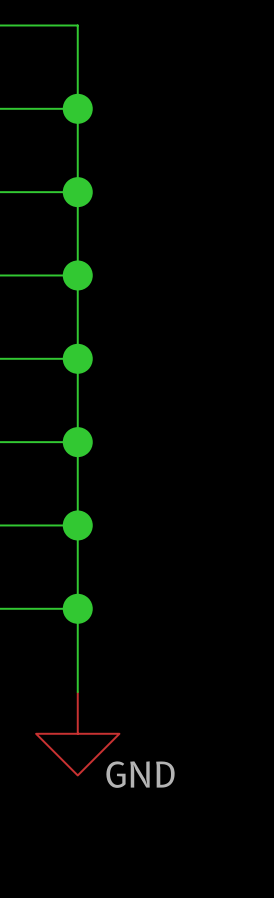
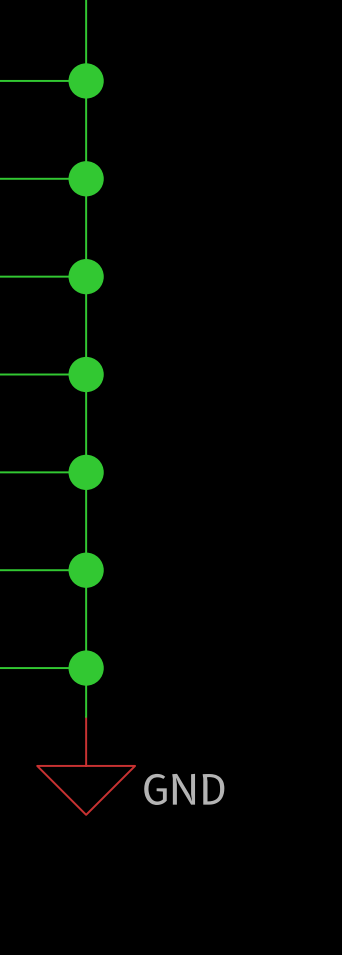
power symbol position: GND (77, 733) -> GND (86, 765)
power symbol text position: GND (140, 774) -> GND (184, 789)

